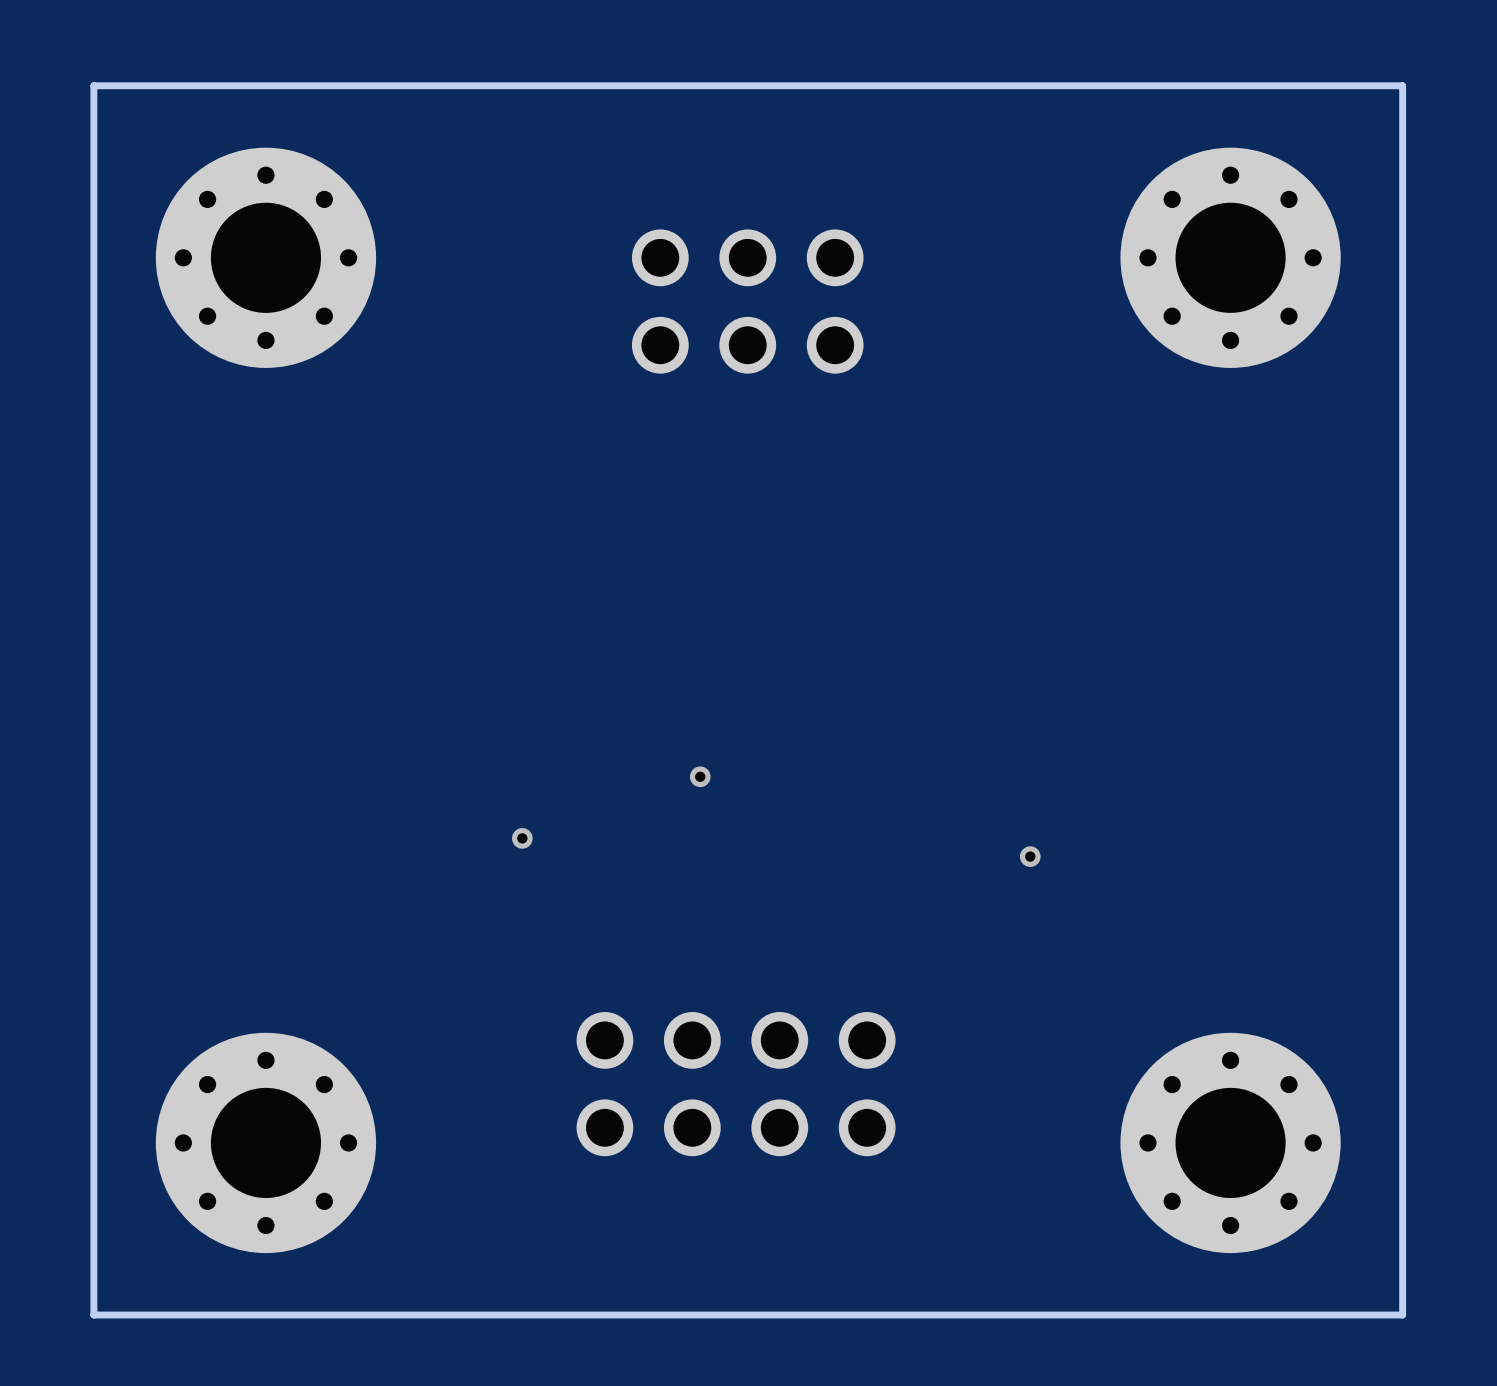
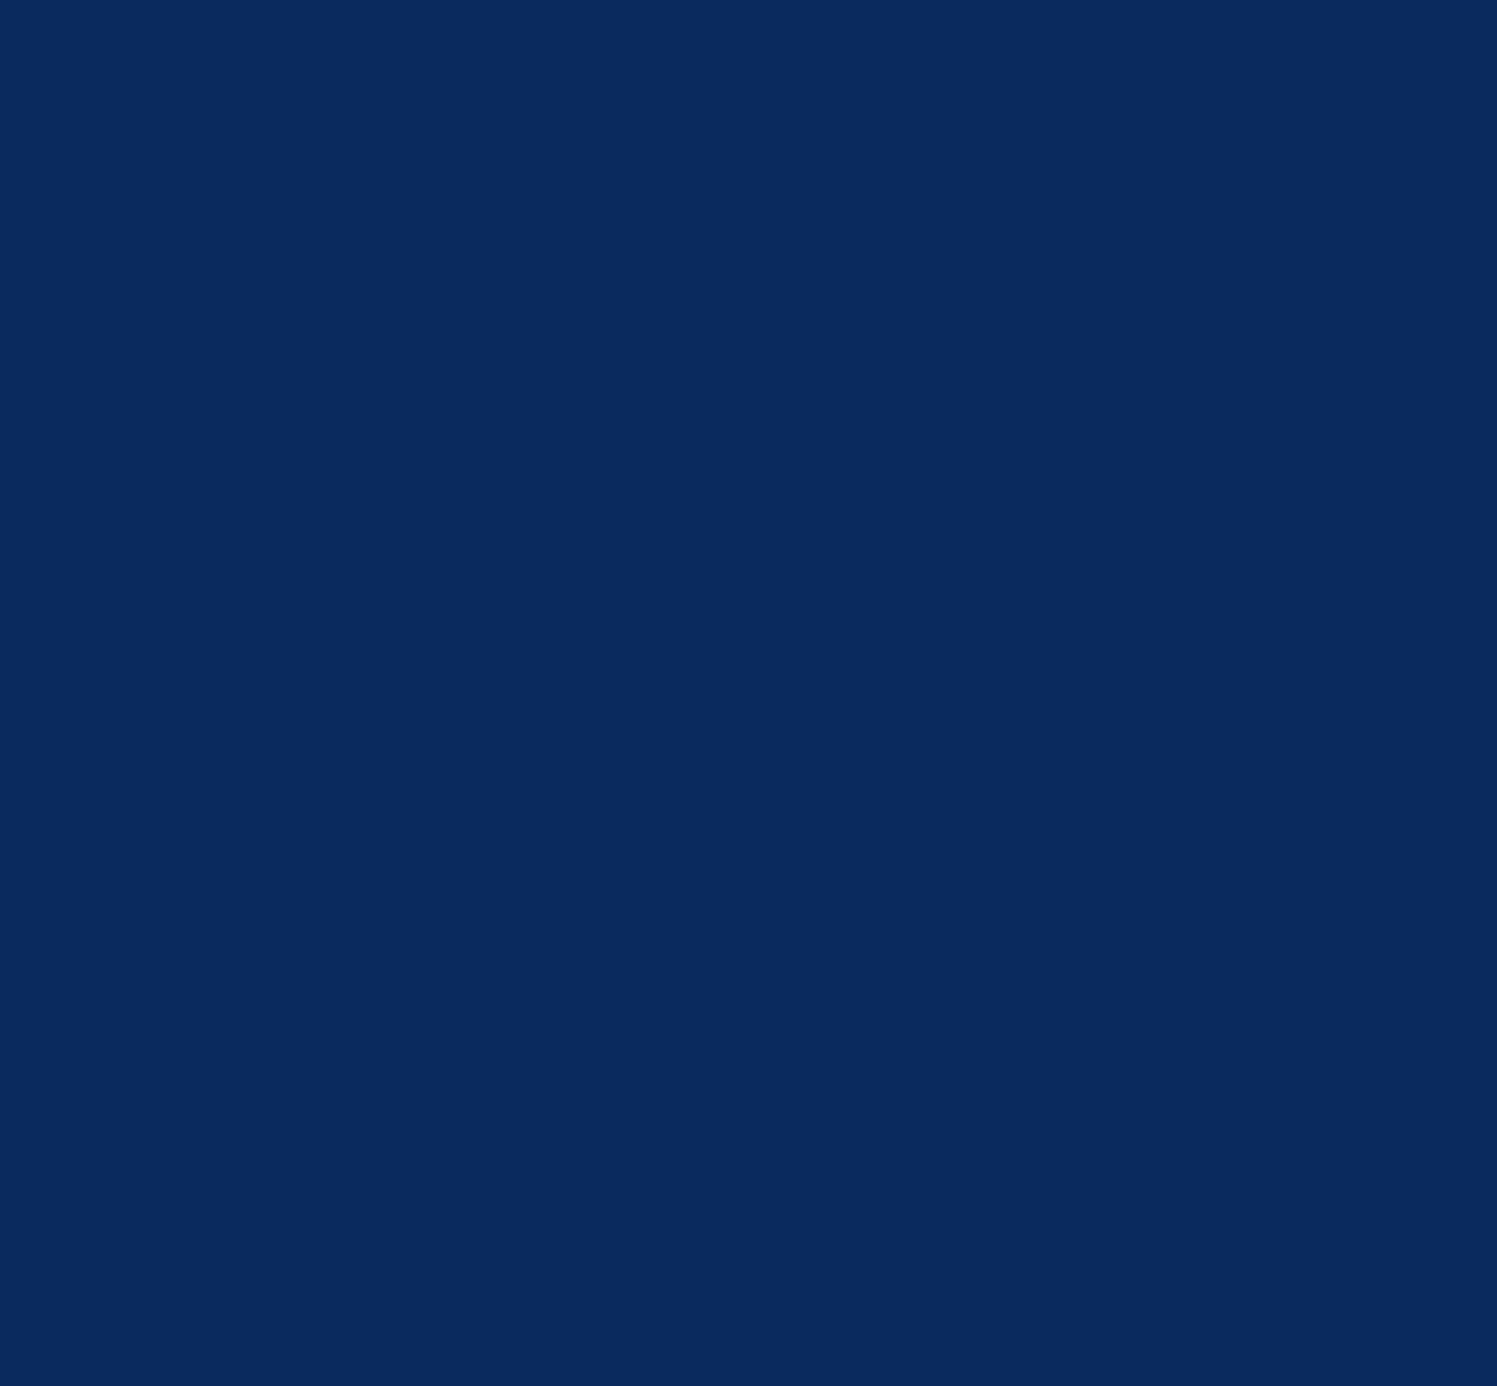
board edge: (1402, 85) (93, 85) (93, 1315) (1402, 1315) (1402, 85) -> none
part: (265, 257) -> none
part: (1230, 257) -> none
part: (747, 301) -> none
via: (700, 776) -> none
via: (522, 838) -> none
via: (1030, 856) -> none
part: (736, 1084) -> none
part: (265, 1142) -> none
part: (1230, 1142) -> none

